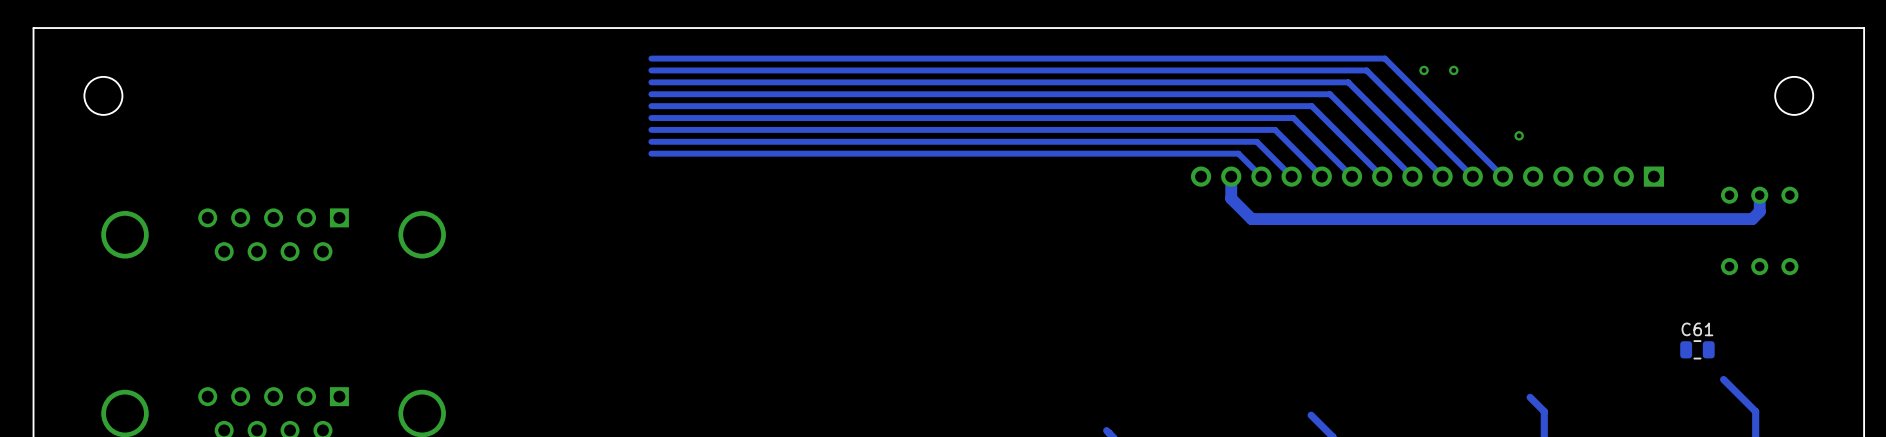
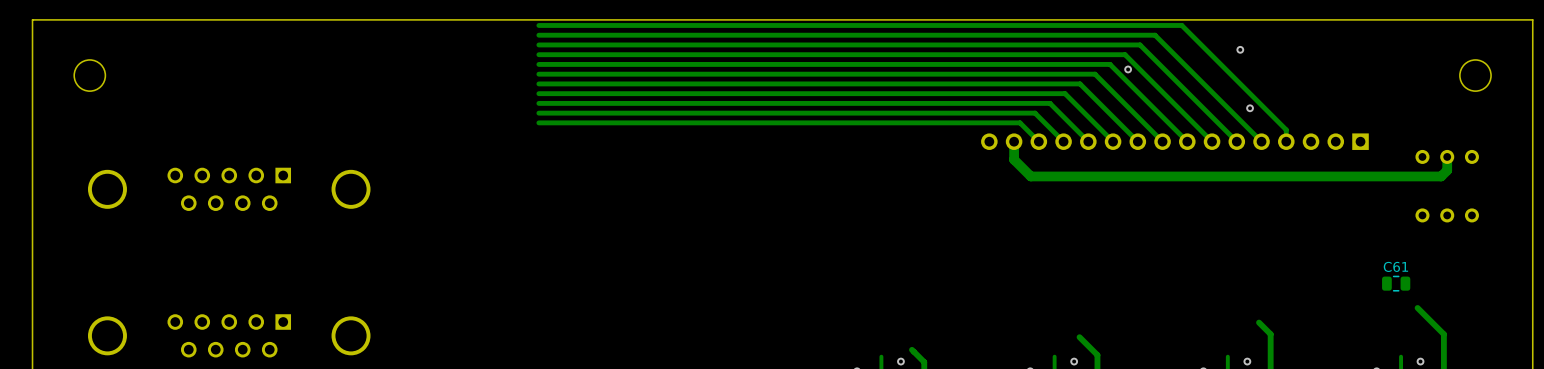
track: none -> (538, 25) (1181, 25) (1286, 129) (1286, 141)
track: none -> (538, 35) (1155, 35) (1261, 141)
via: none -> (1240, 49)
via: (1424, 70) -> none
via: (1453, 70) -> none
via: none -> (1128, 69)

